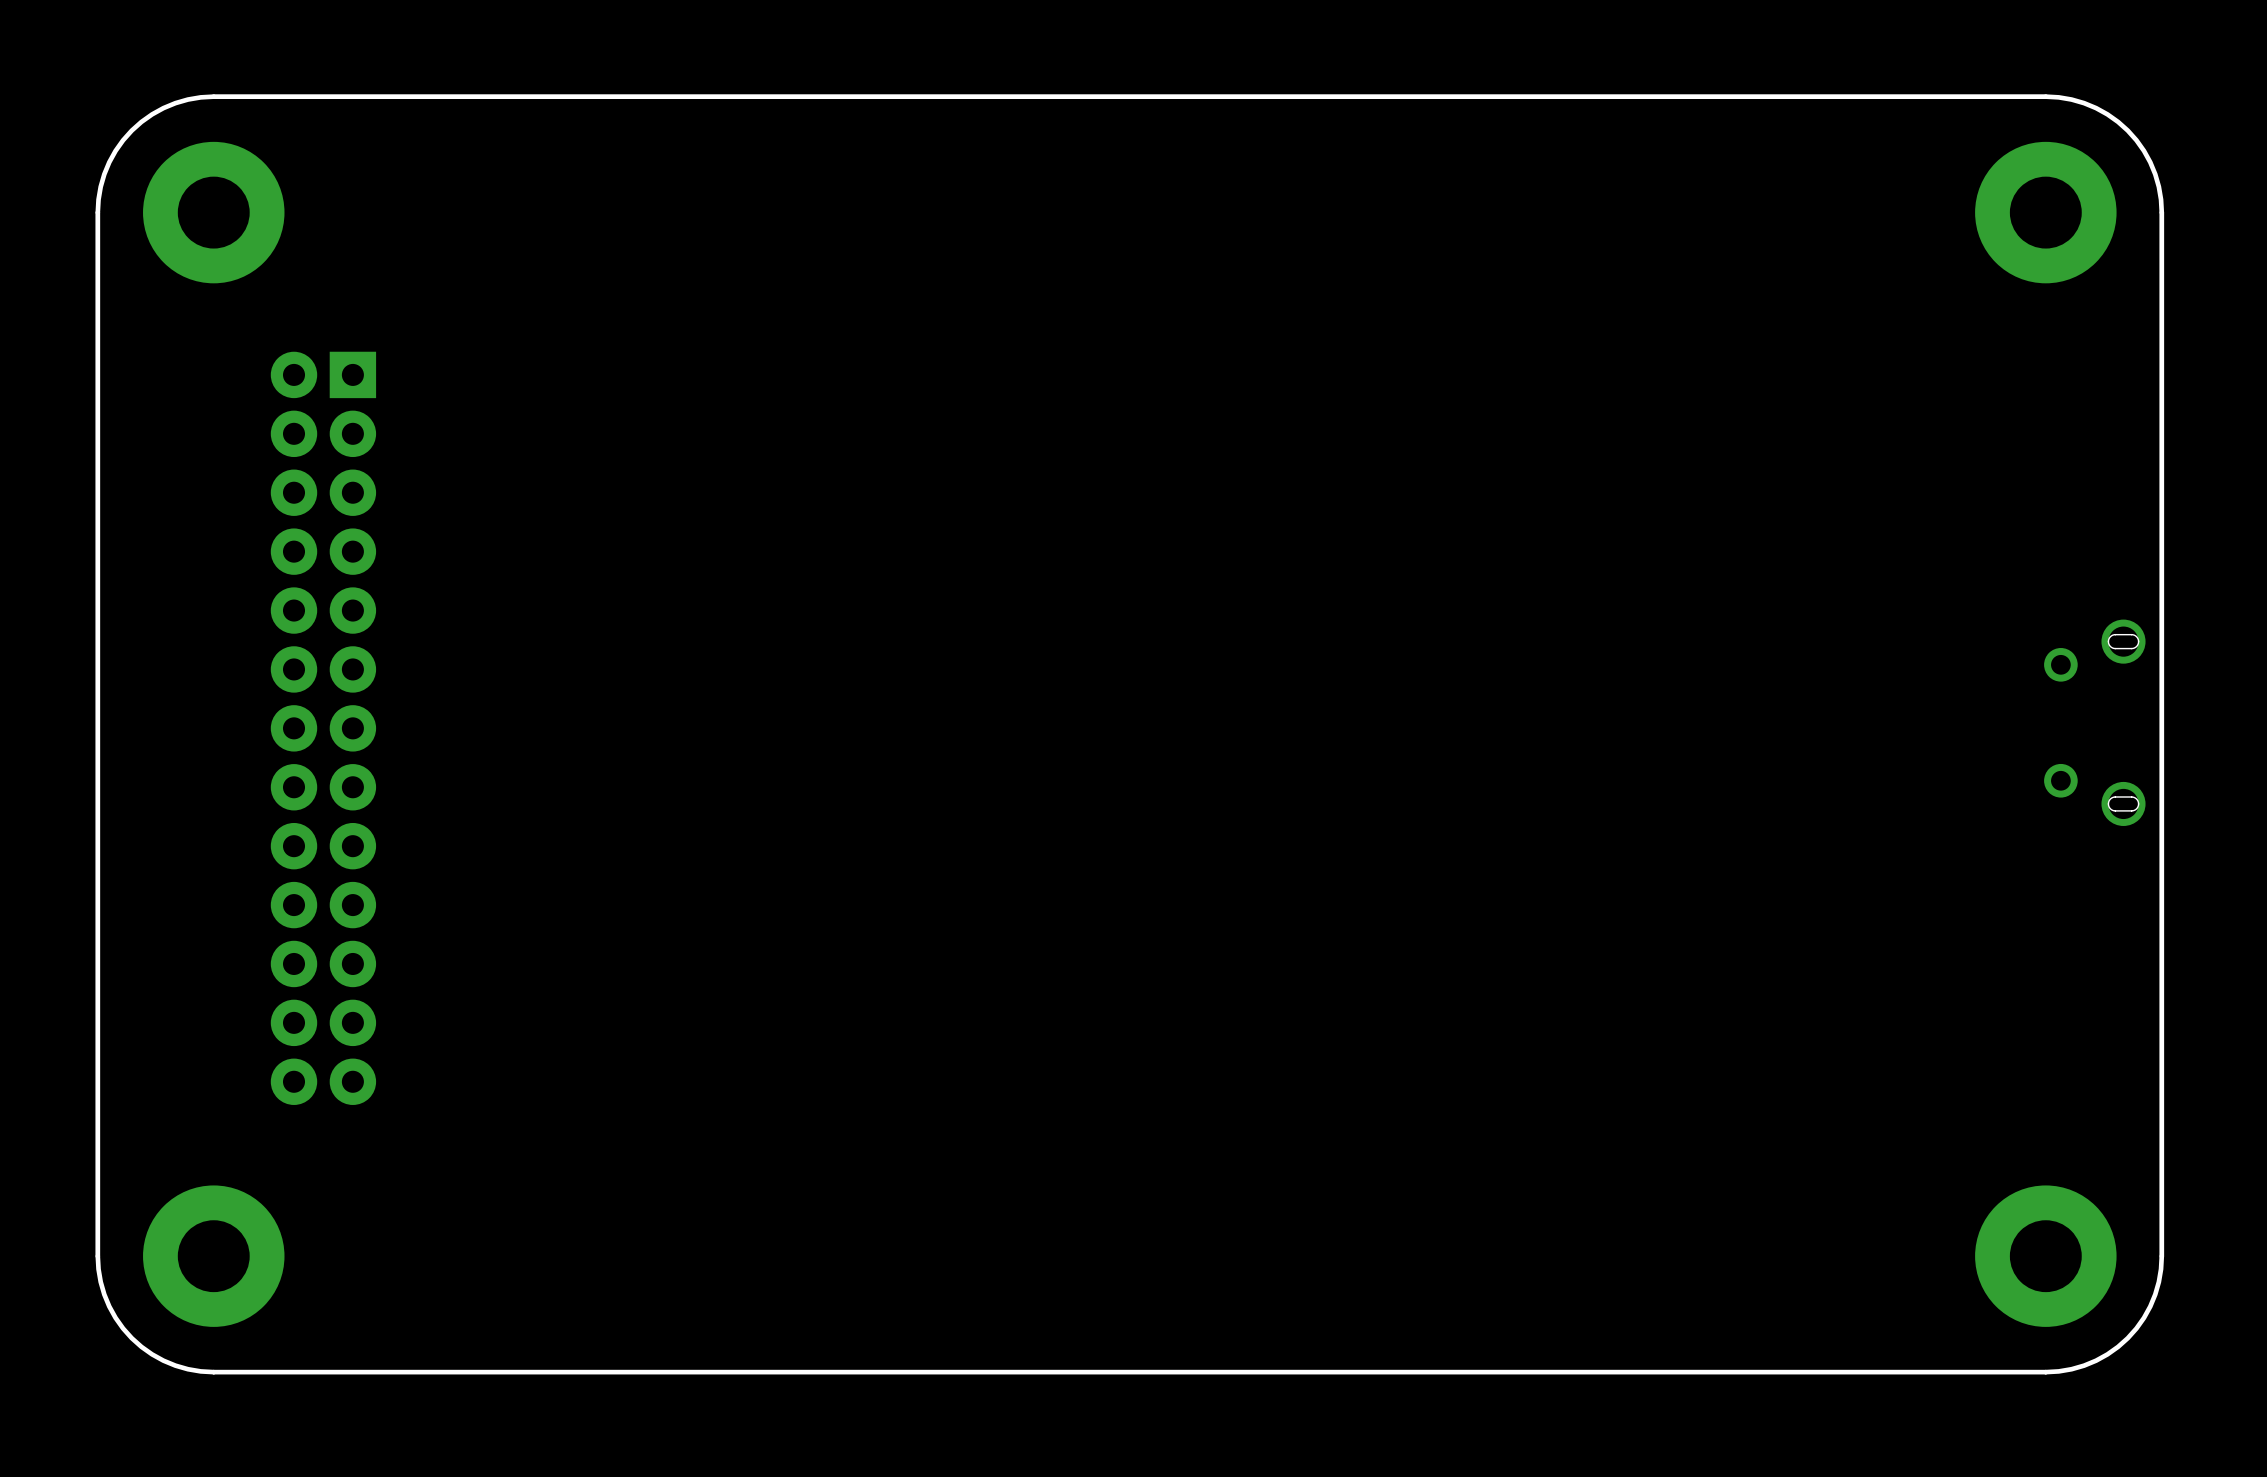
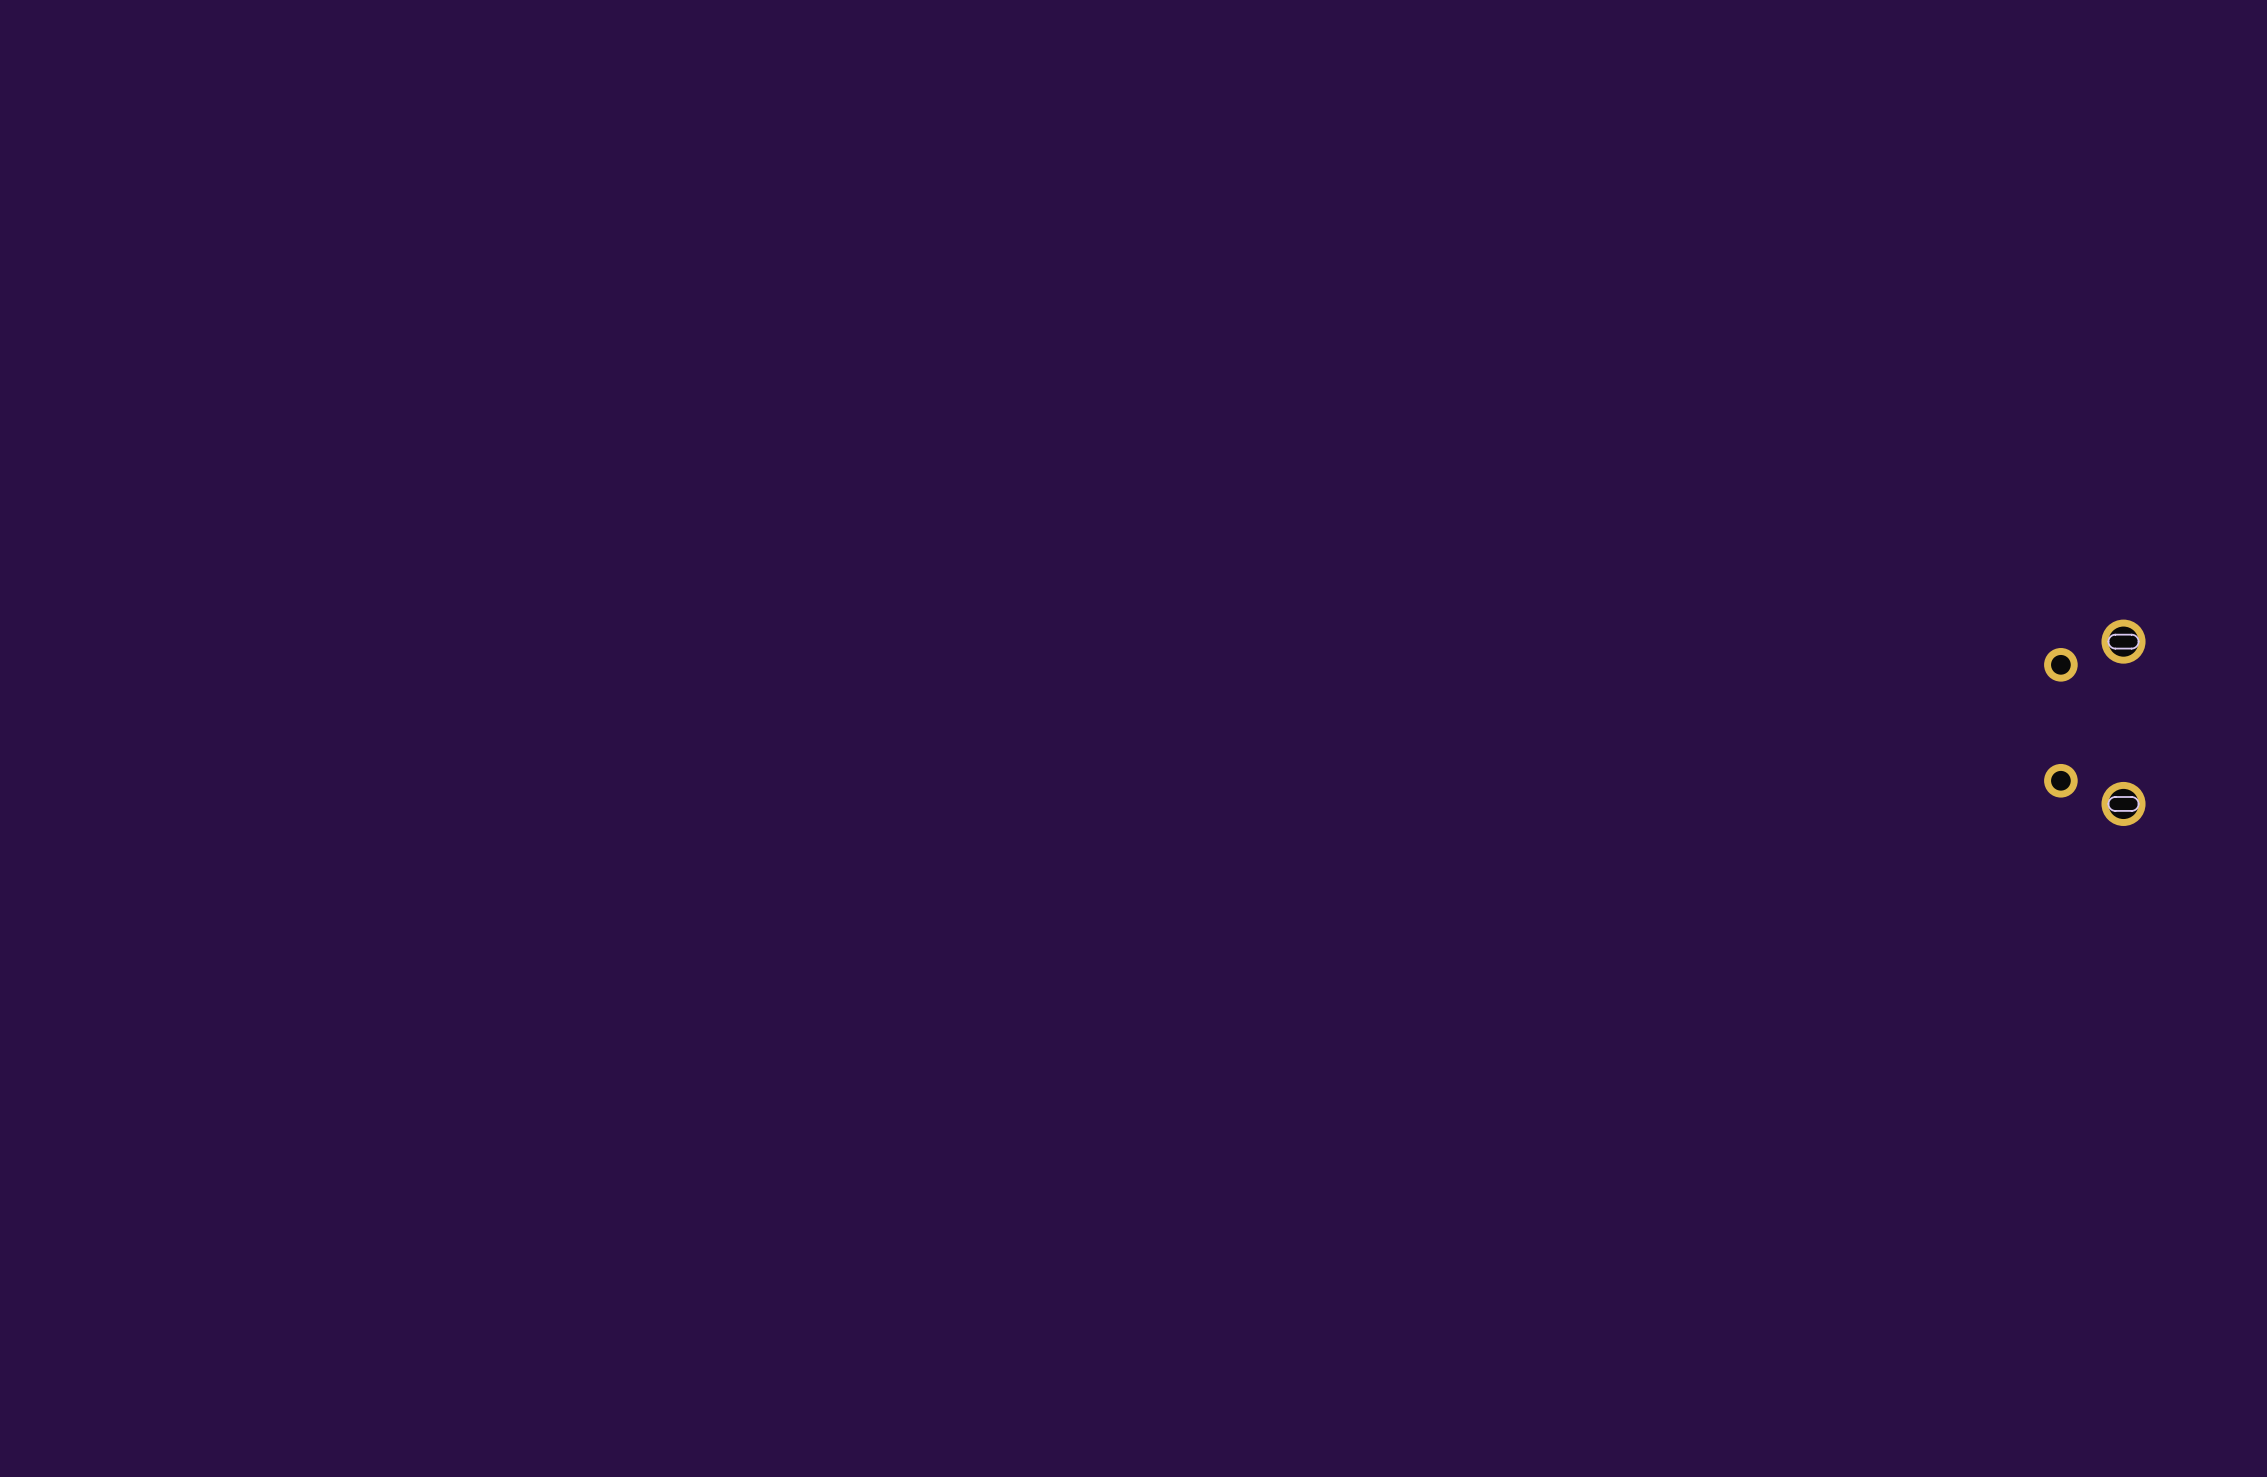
board edge: (2045, 96) (213, 96) (187, 99) (152, 114) (131, 130) (109, 162) (100, 186) (97, 212) (97, 1256) (104, 1294) (115, 1317) (131, 1338) (152, 1354) (187, 1369) (213, 1372) (2045, 1372) (2071, 1369) (2107, 1354) (2127, 1338) (2144, 1317) (2158, 1281) (2161, 1256) (2161, 212) (2155, 174) (2144, 150) (2127, 130) (2107, 114) (2084, 103) (2045, 96) -> none
part: (213, 212) -> none
part: (2045, 212) -> none
part: (323, 728) -> none
part: (213, 1256) -> none
part: (2045, 1256) -> none

